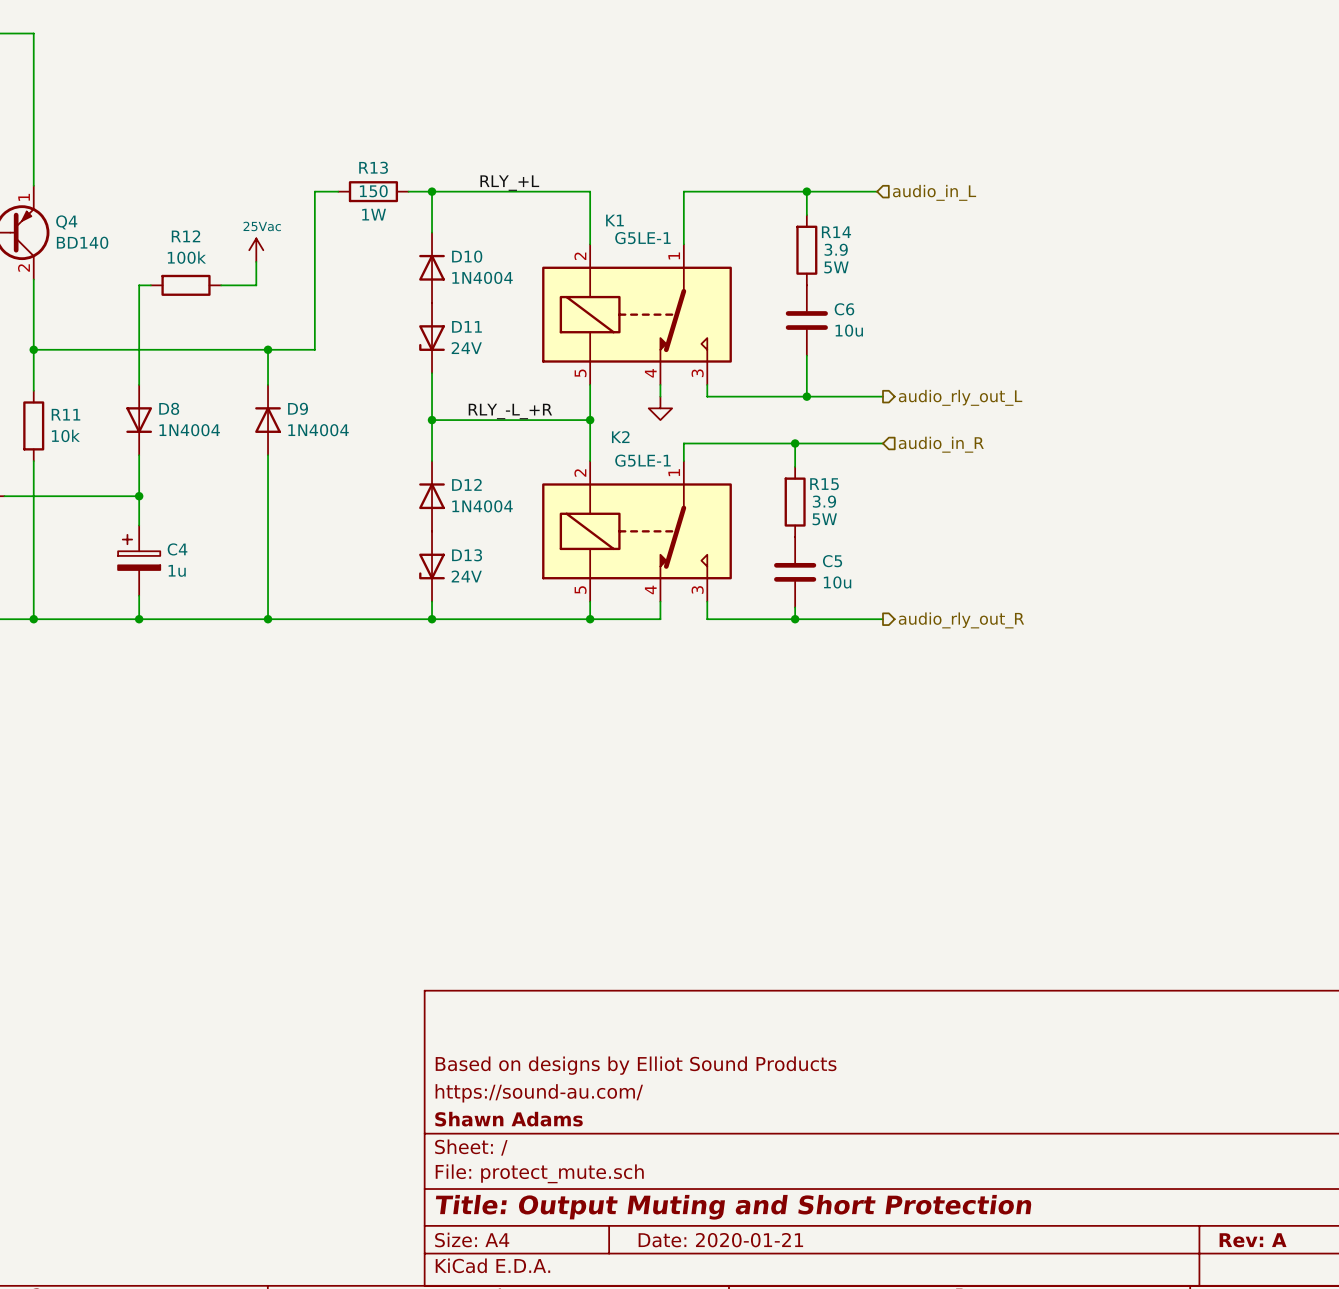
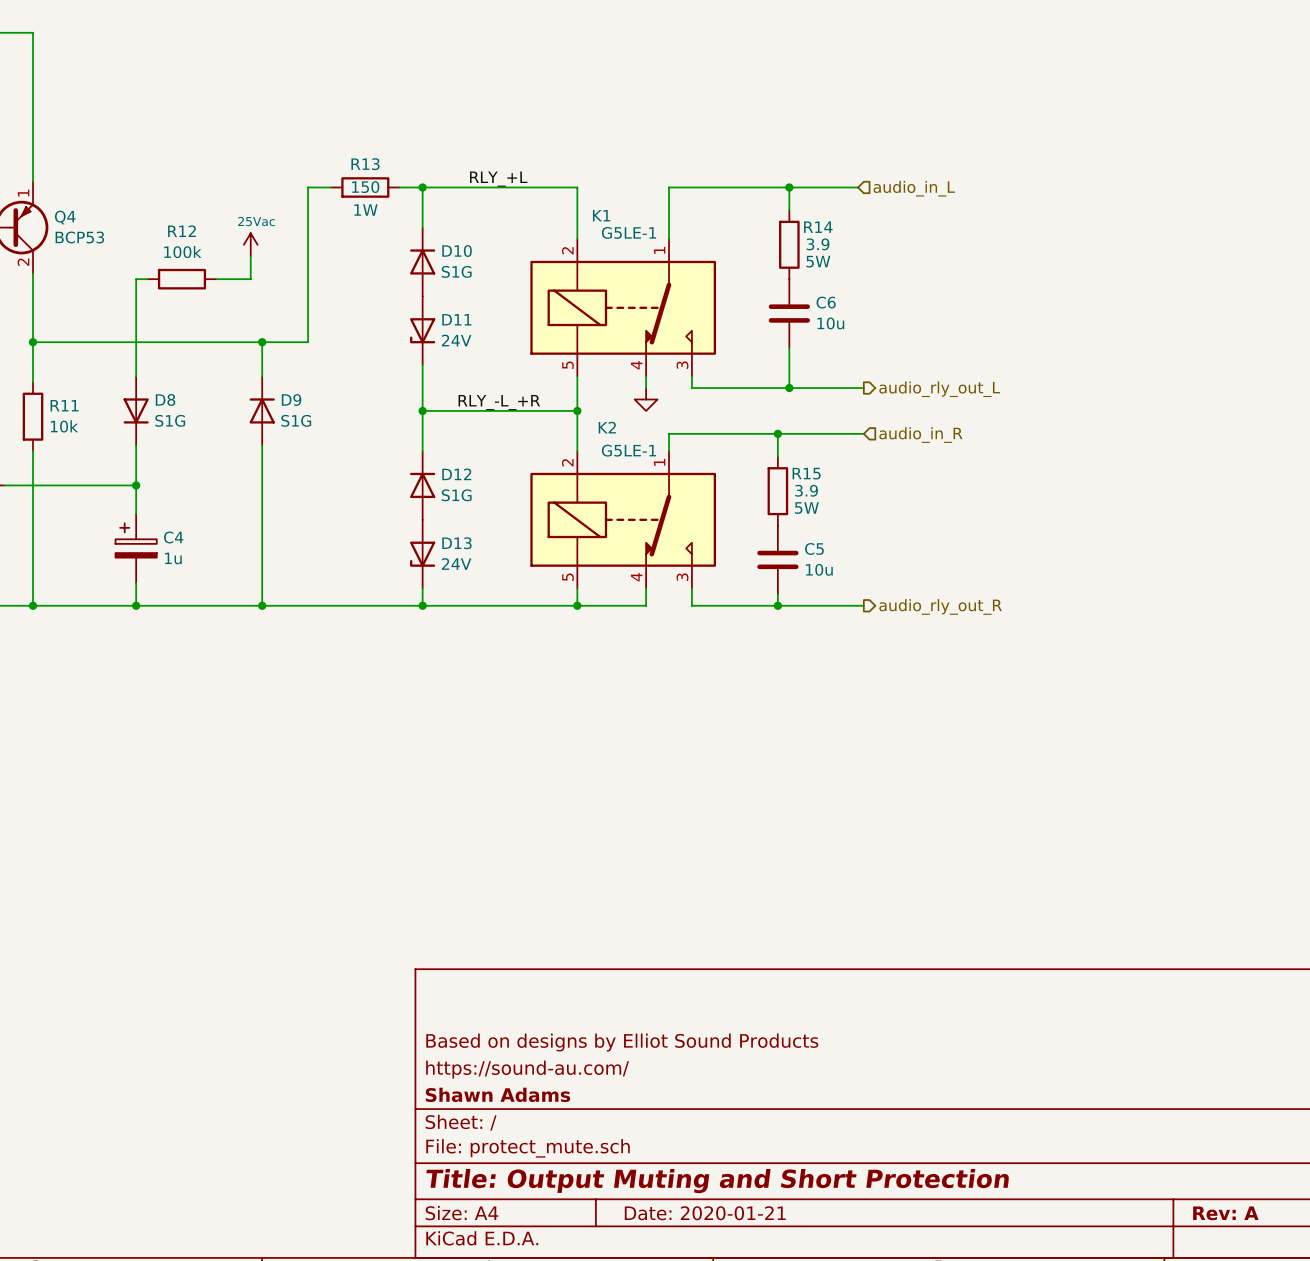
Q4 value: BD140 (82, 242) -> BCP53 (79, 237)
D10 value: 1N4004 (482, 277) -> S1G (456, 271)
D8 value: 1N4004 (189, 430) -> S1G (170, 420)
D9 value: 1N4004 (318, 430) -> S1G (296, 420)
D12 value: 1N4004 (482, 506) -> S1G (456, 495)

